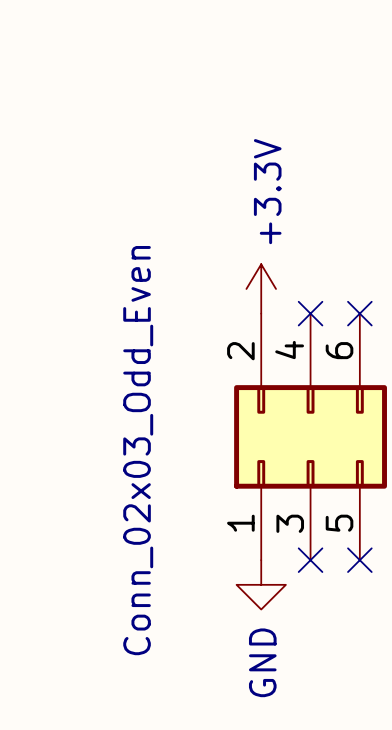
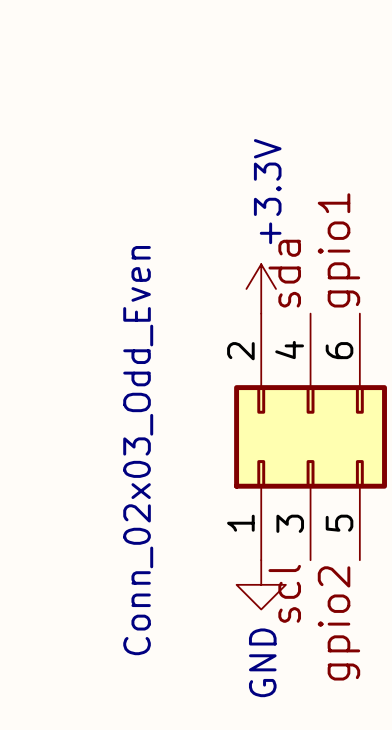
label: none -> gpio1 (338, 250)
label: none -> sda (284, 273)
no-connect mark: (310, 313) -> none
no-connect mark: (359, 313) -> none
no-connect mark: (310, 560) -> none
no-connect mark: (359, 560) -> none
label: none -> scl (284, 593)
label: none -> gpio2 (338, 623)

